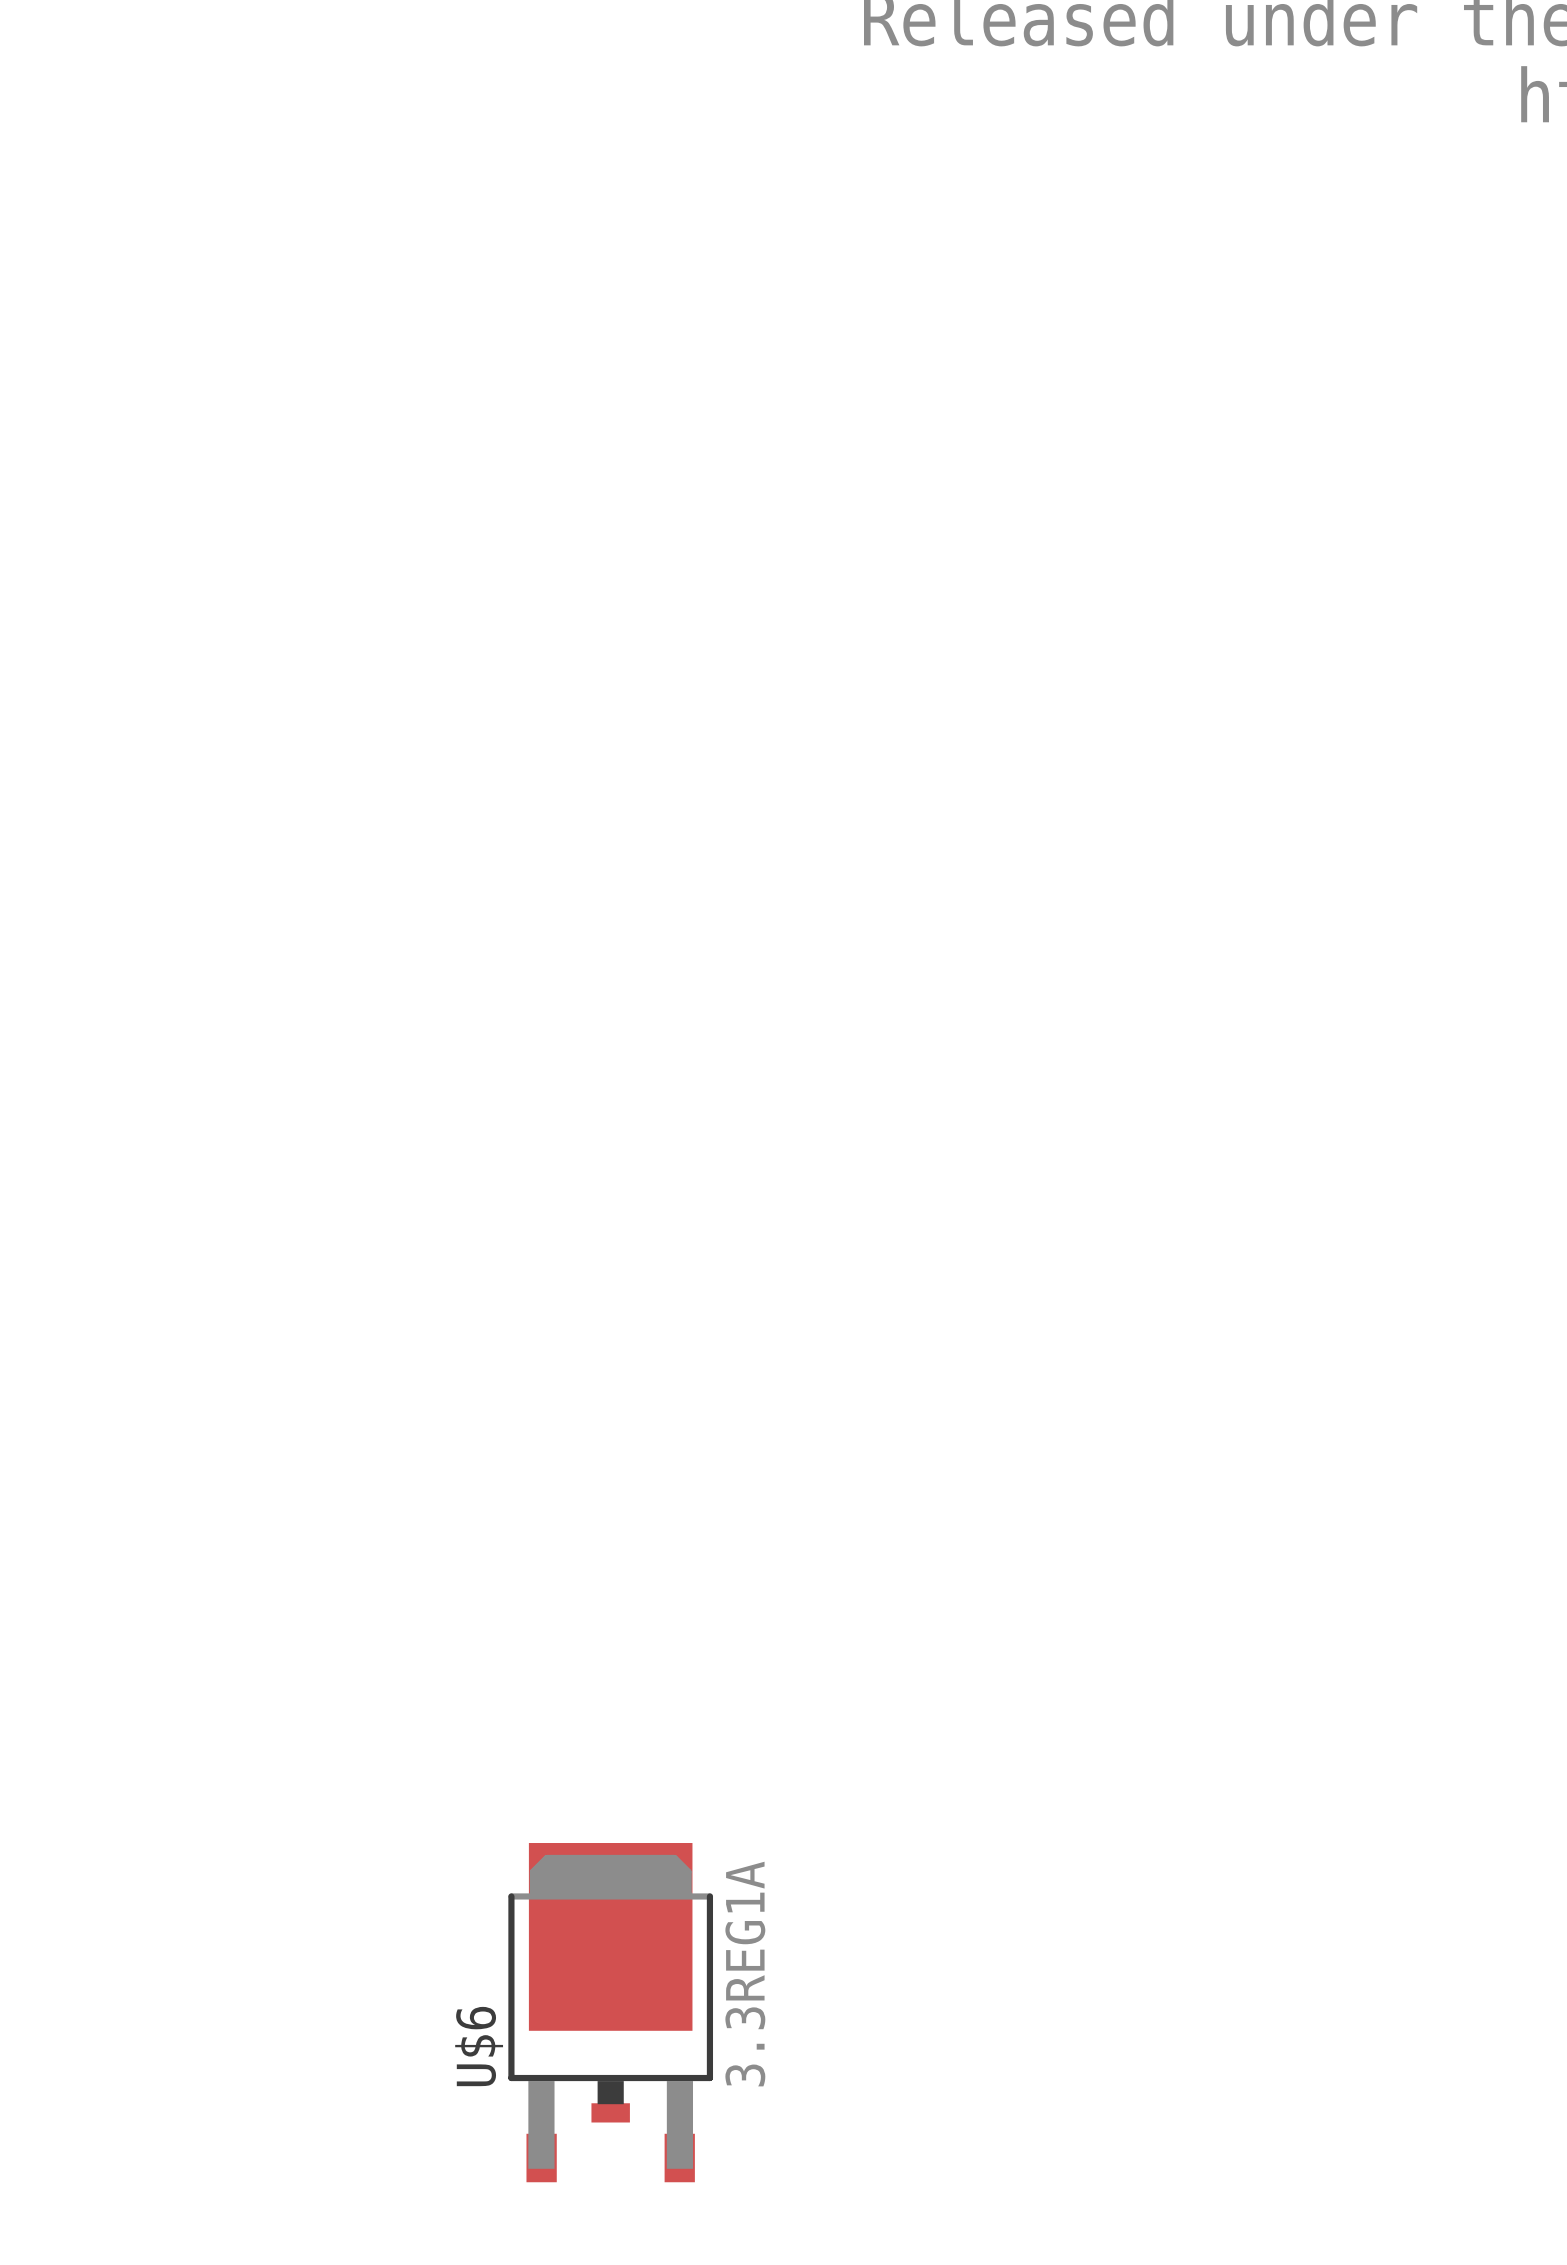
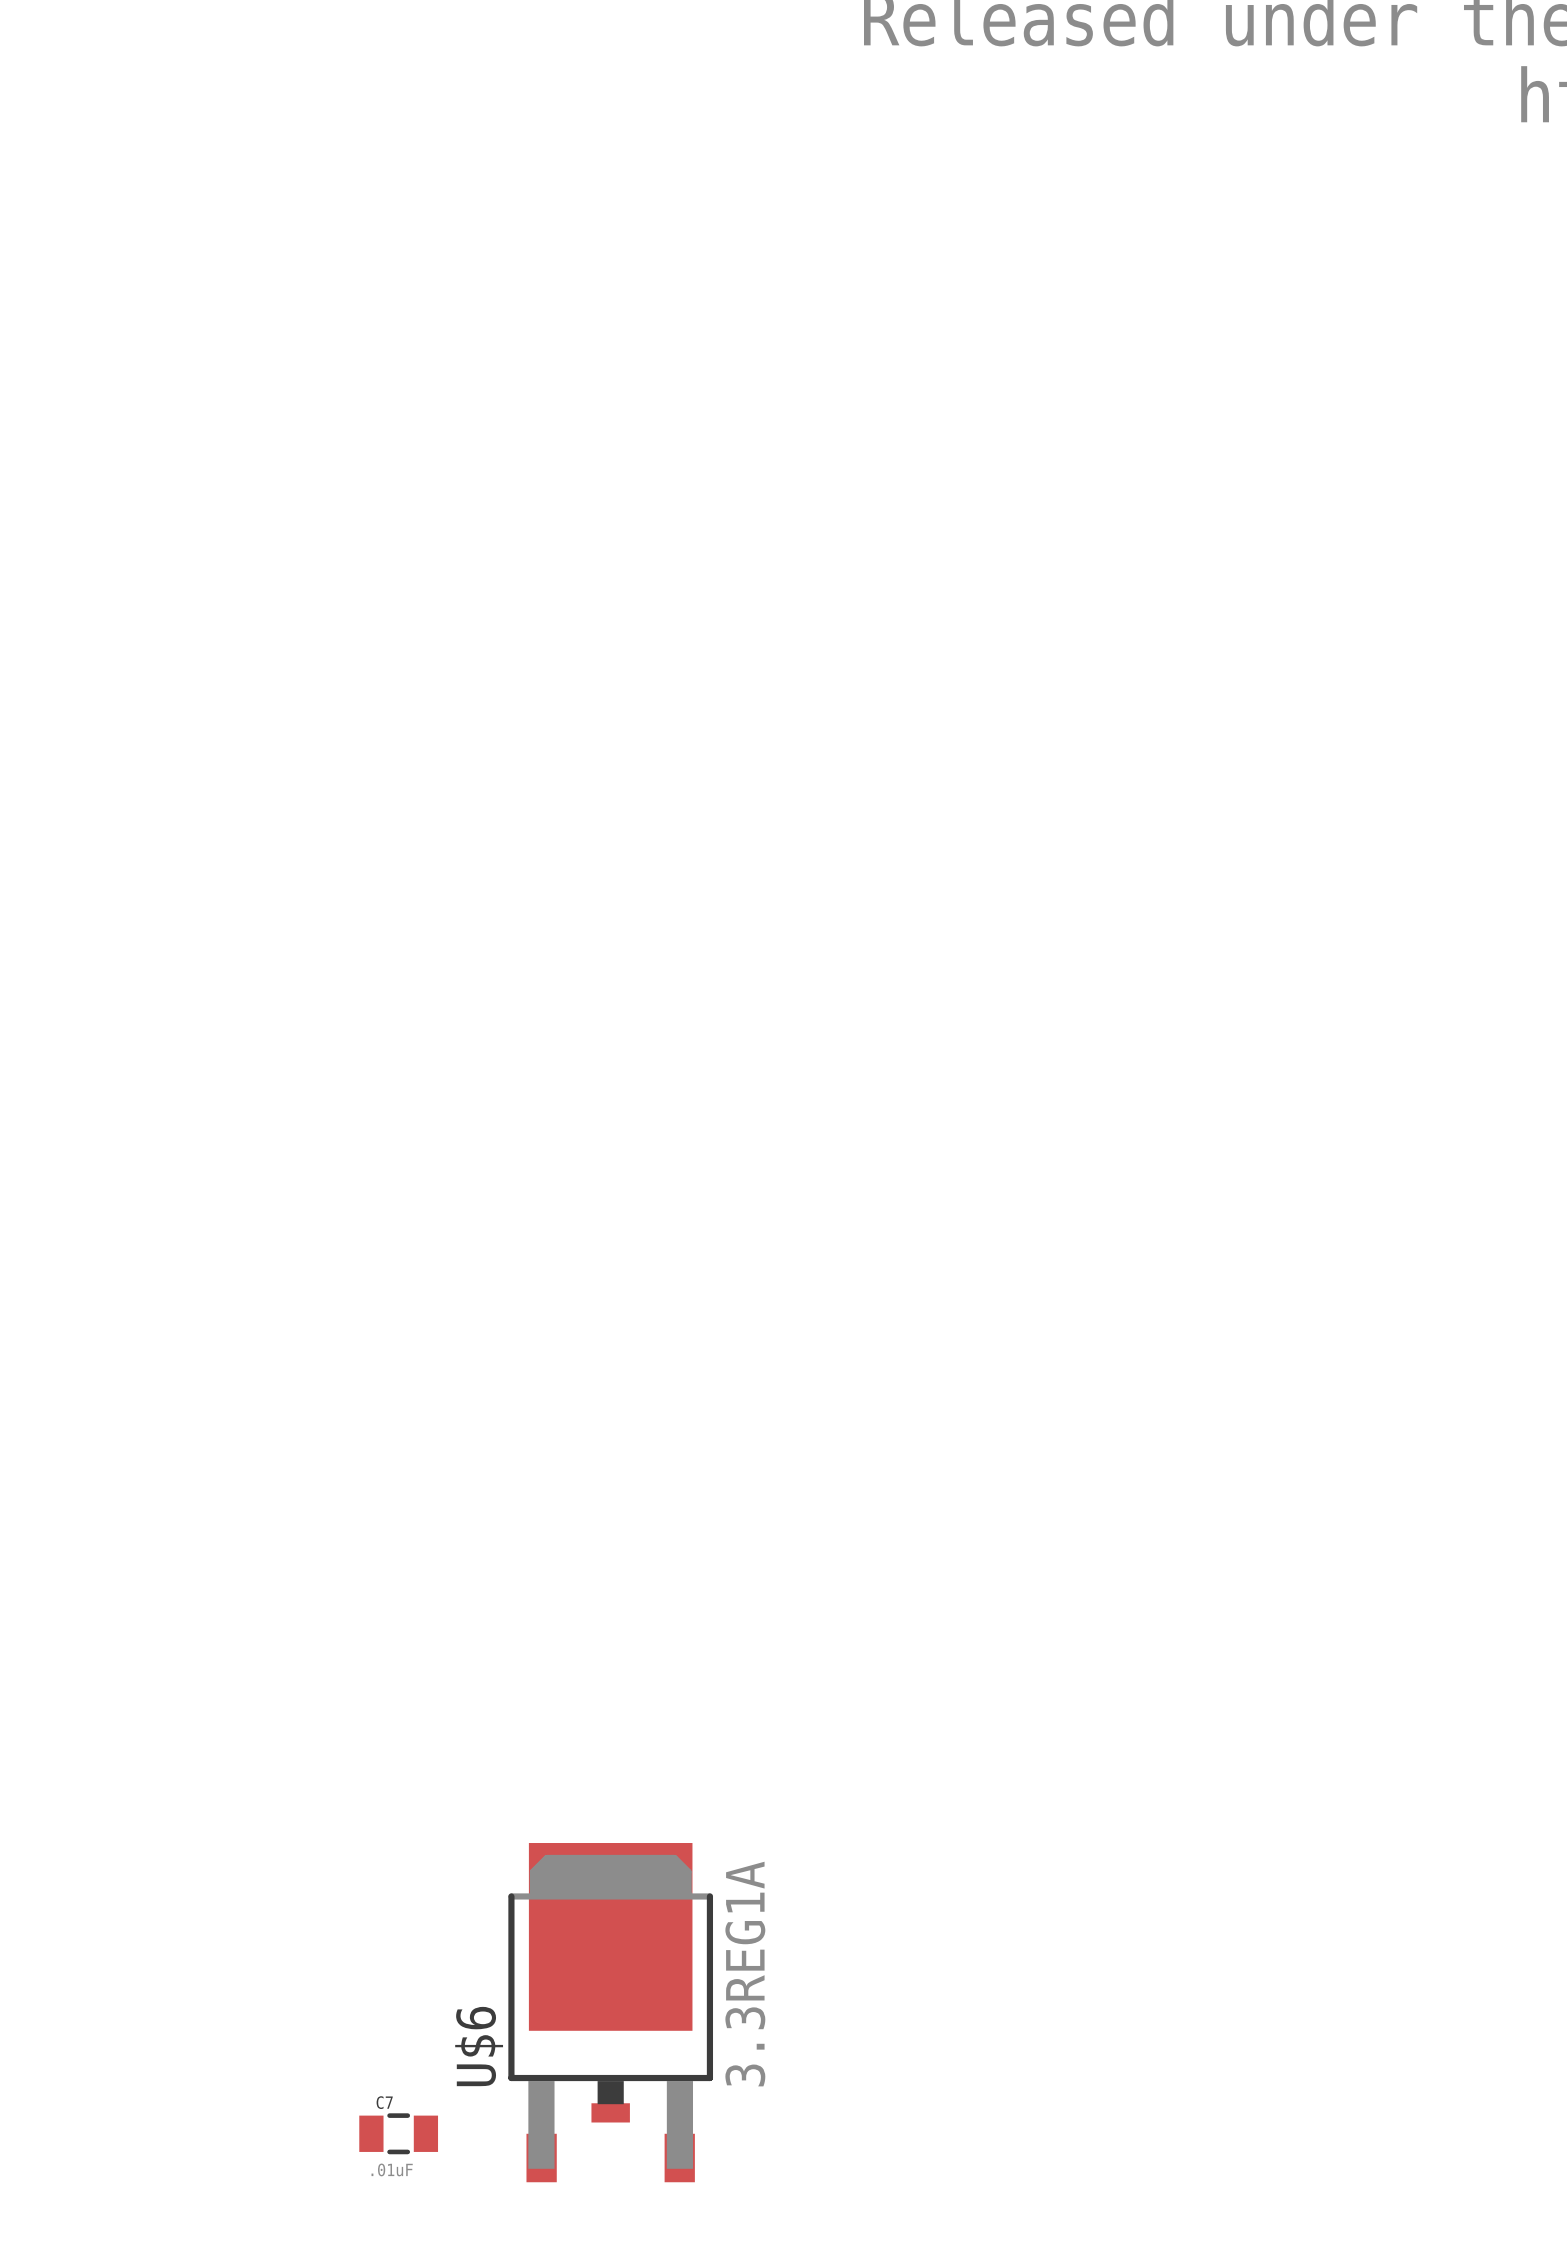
C7: none -> .01uF (398, 2133)

